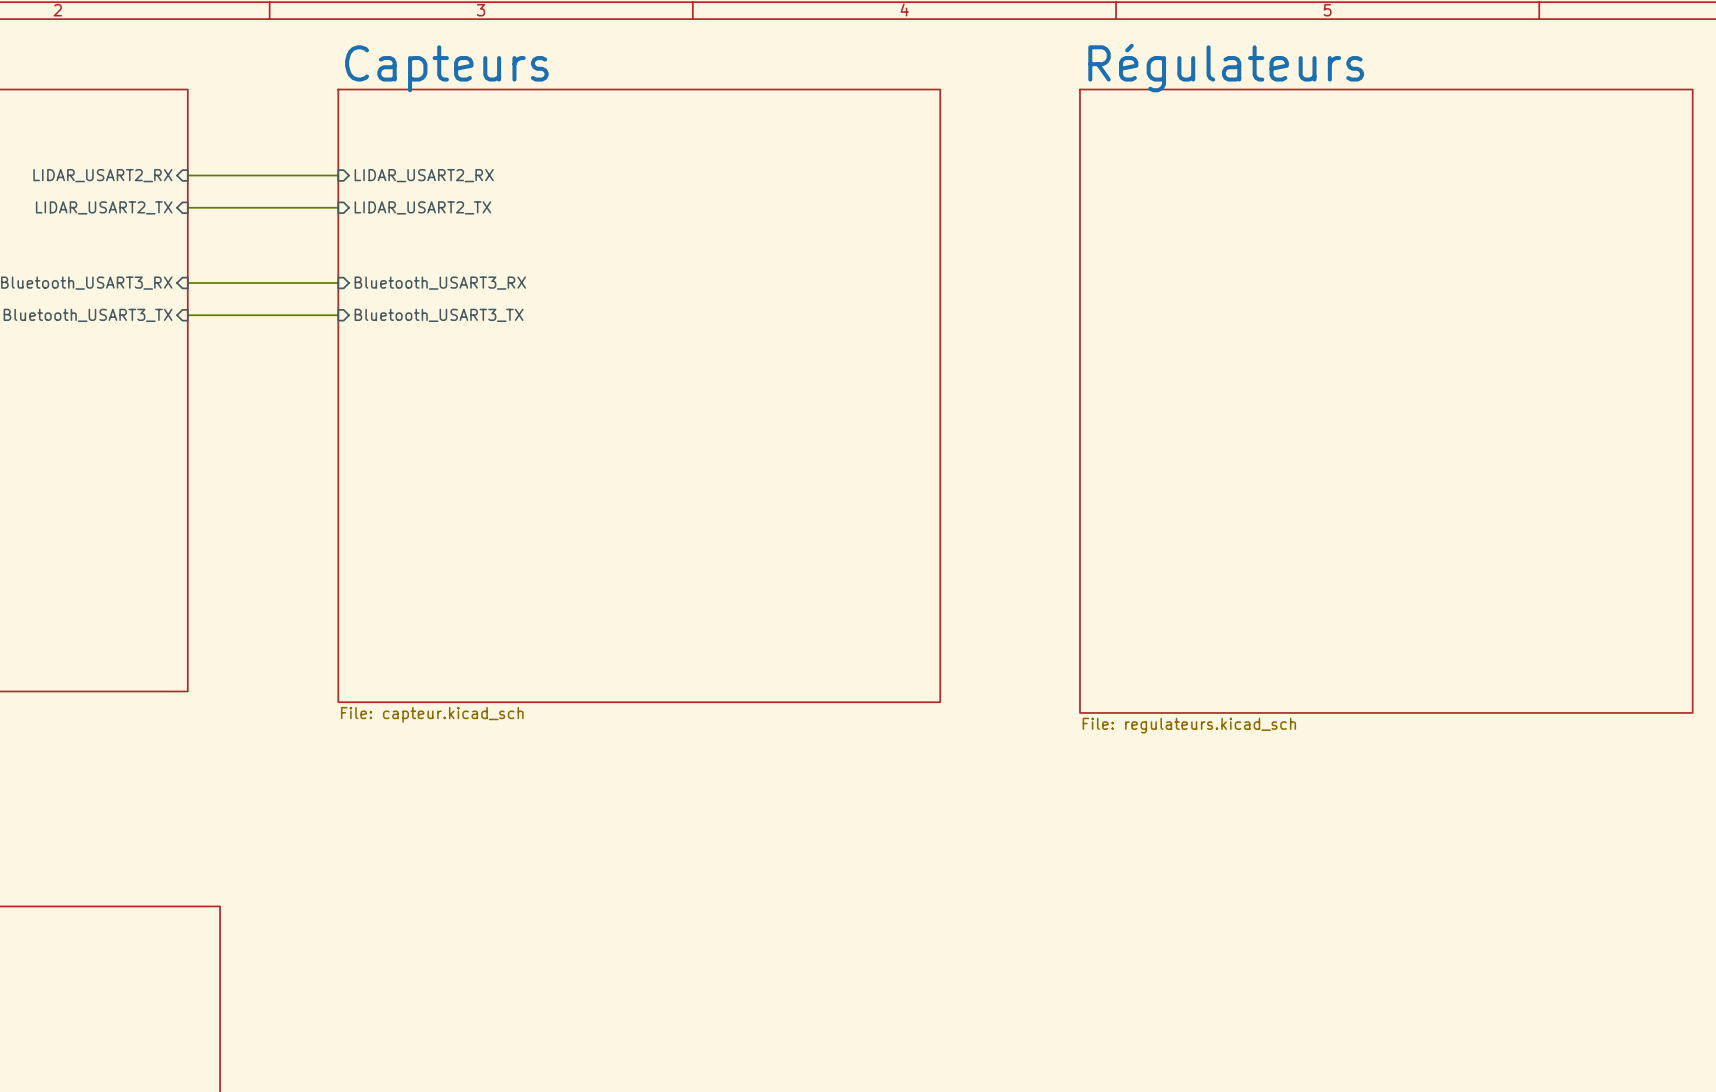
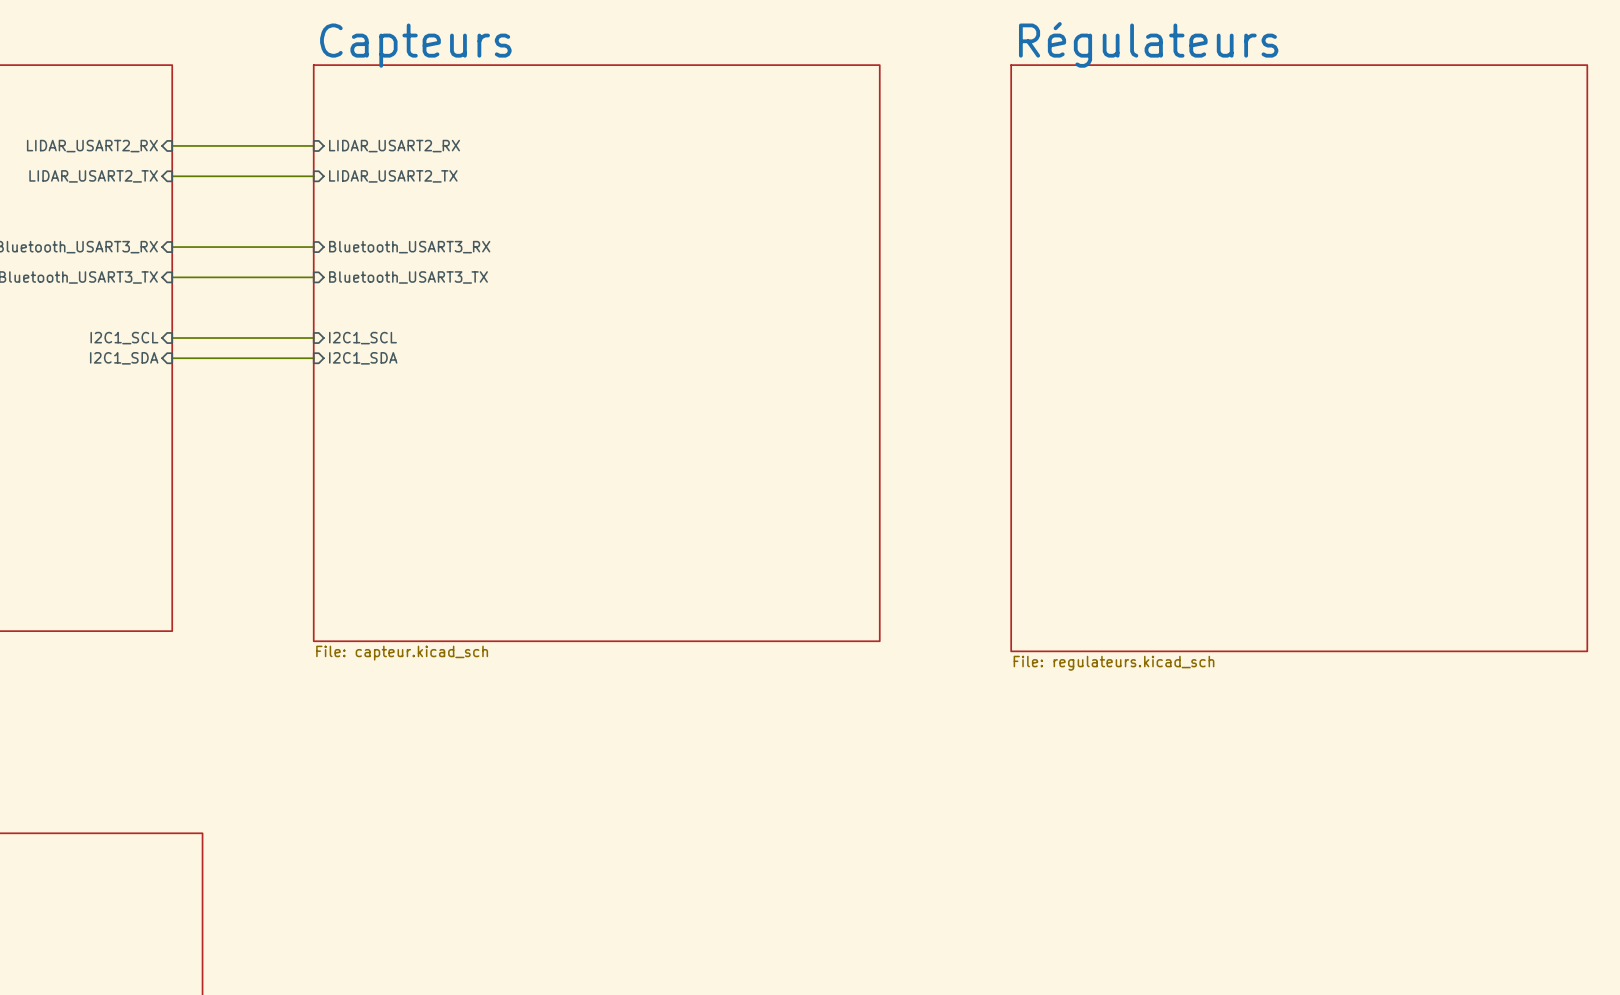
sheet pin: none -> I2C1_SCL (124, 338)
wire: none -> (172, 338) (313, 338)
sheet pin: none -> I2C1_SCL (362, 338)
sheet pin: none -> I2C1_SDA (124, 358)
wire: none -> (172, 358) (313, 358)
sheet pin: none -> I2C1_SDA (363, 358)

